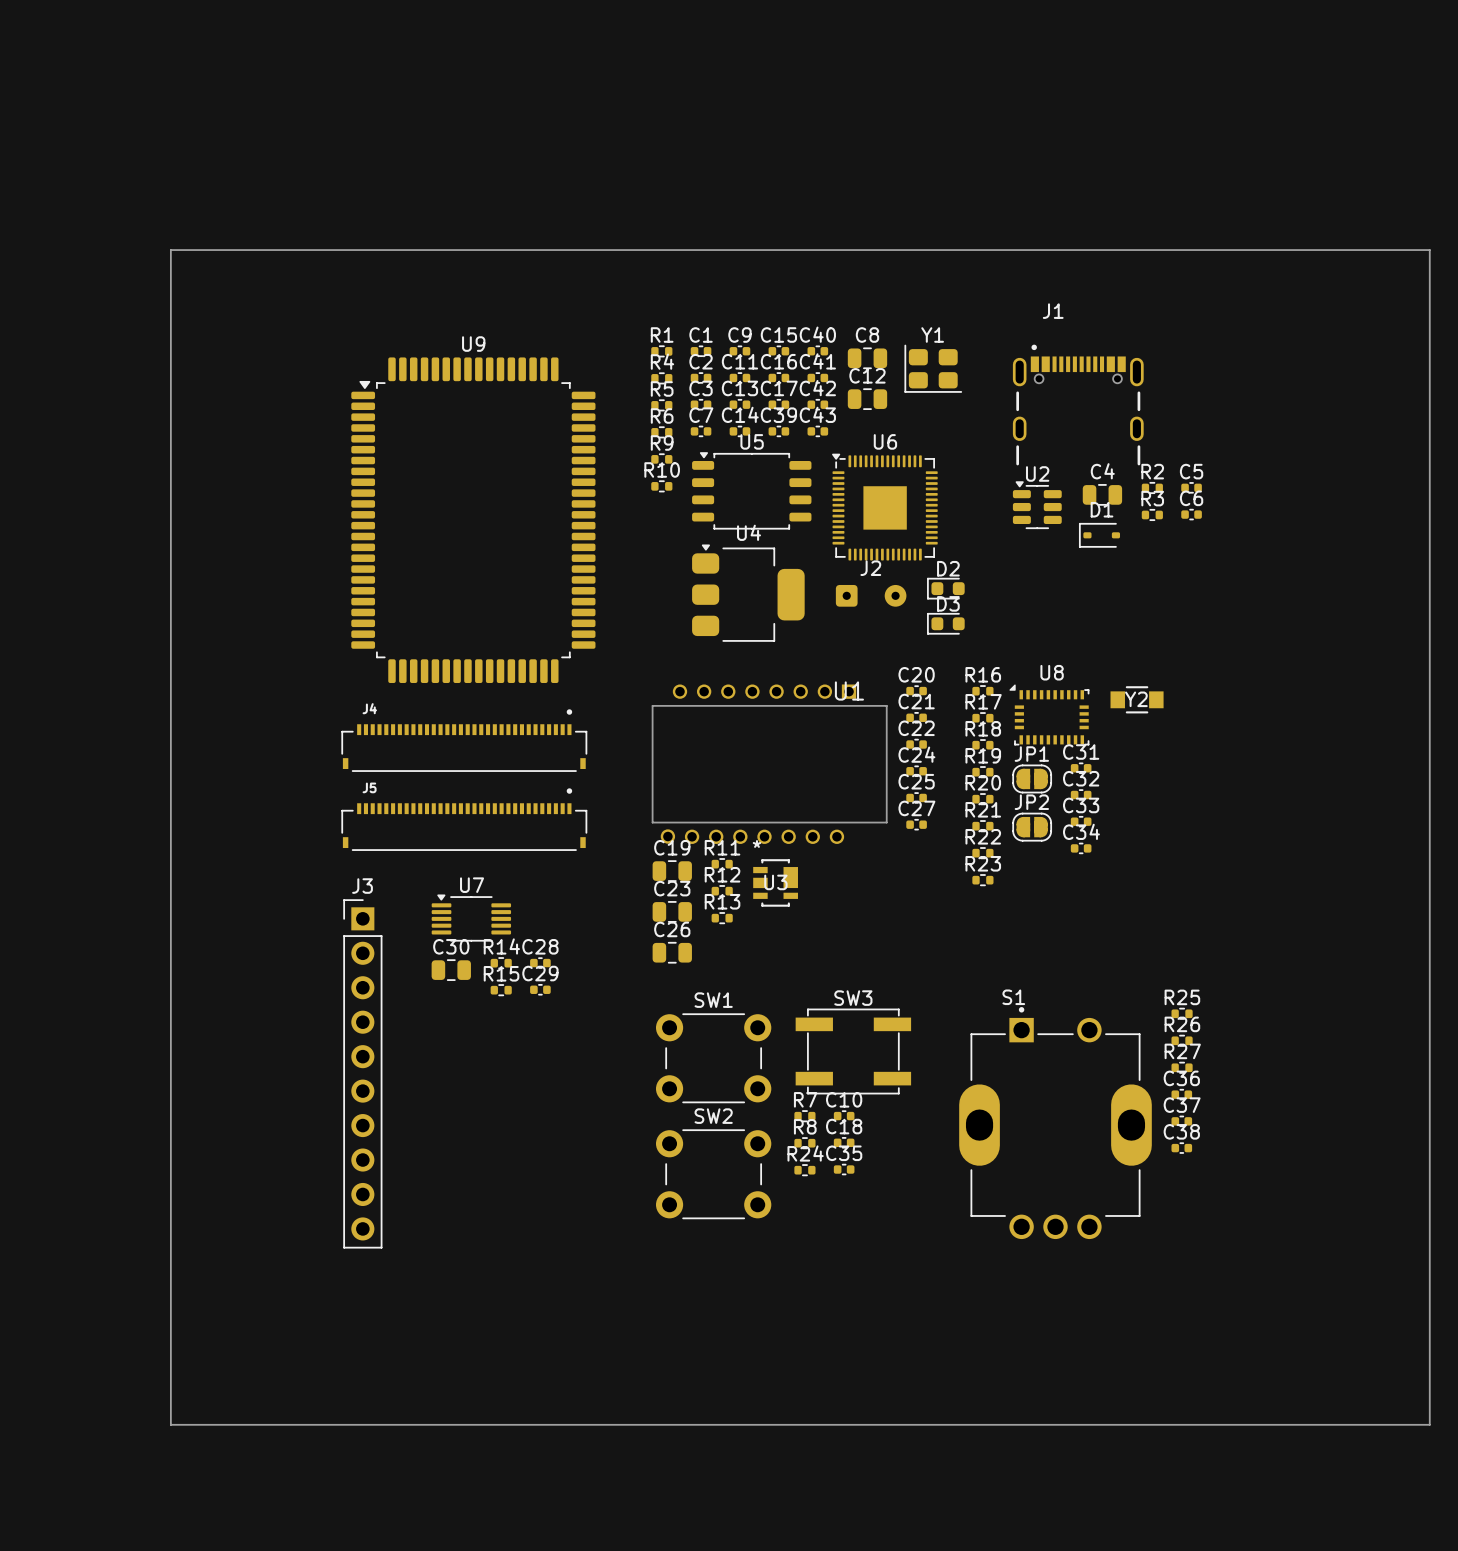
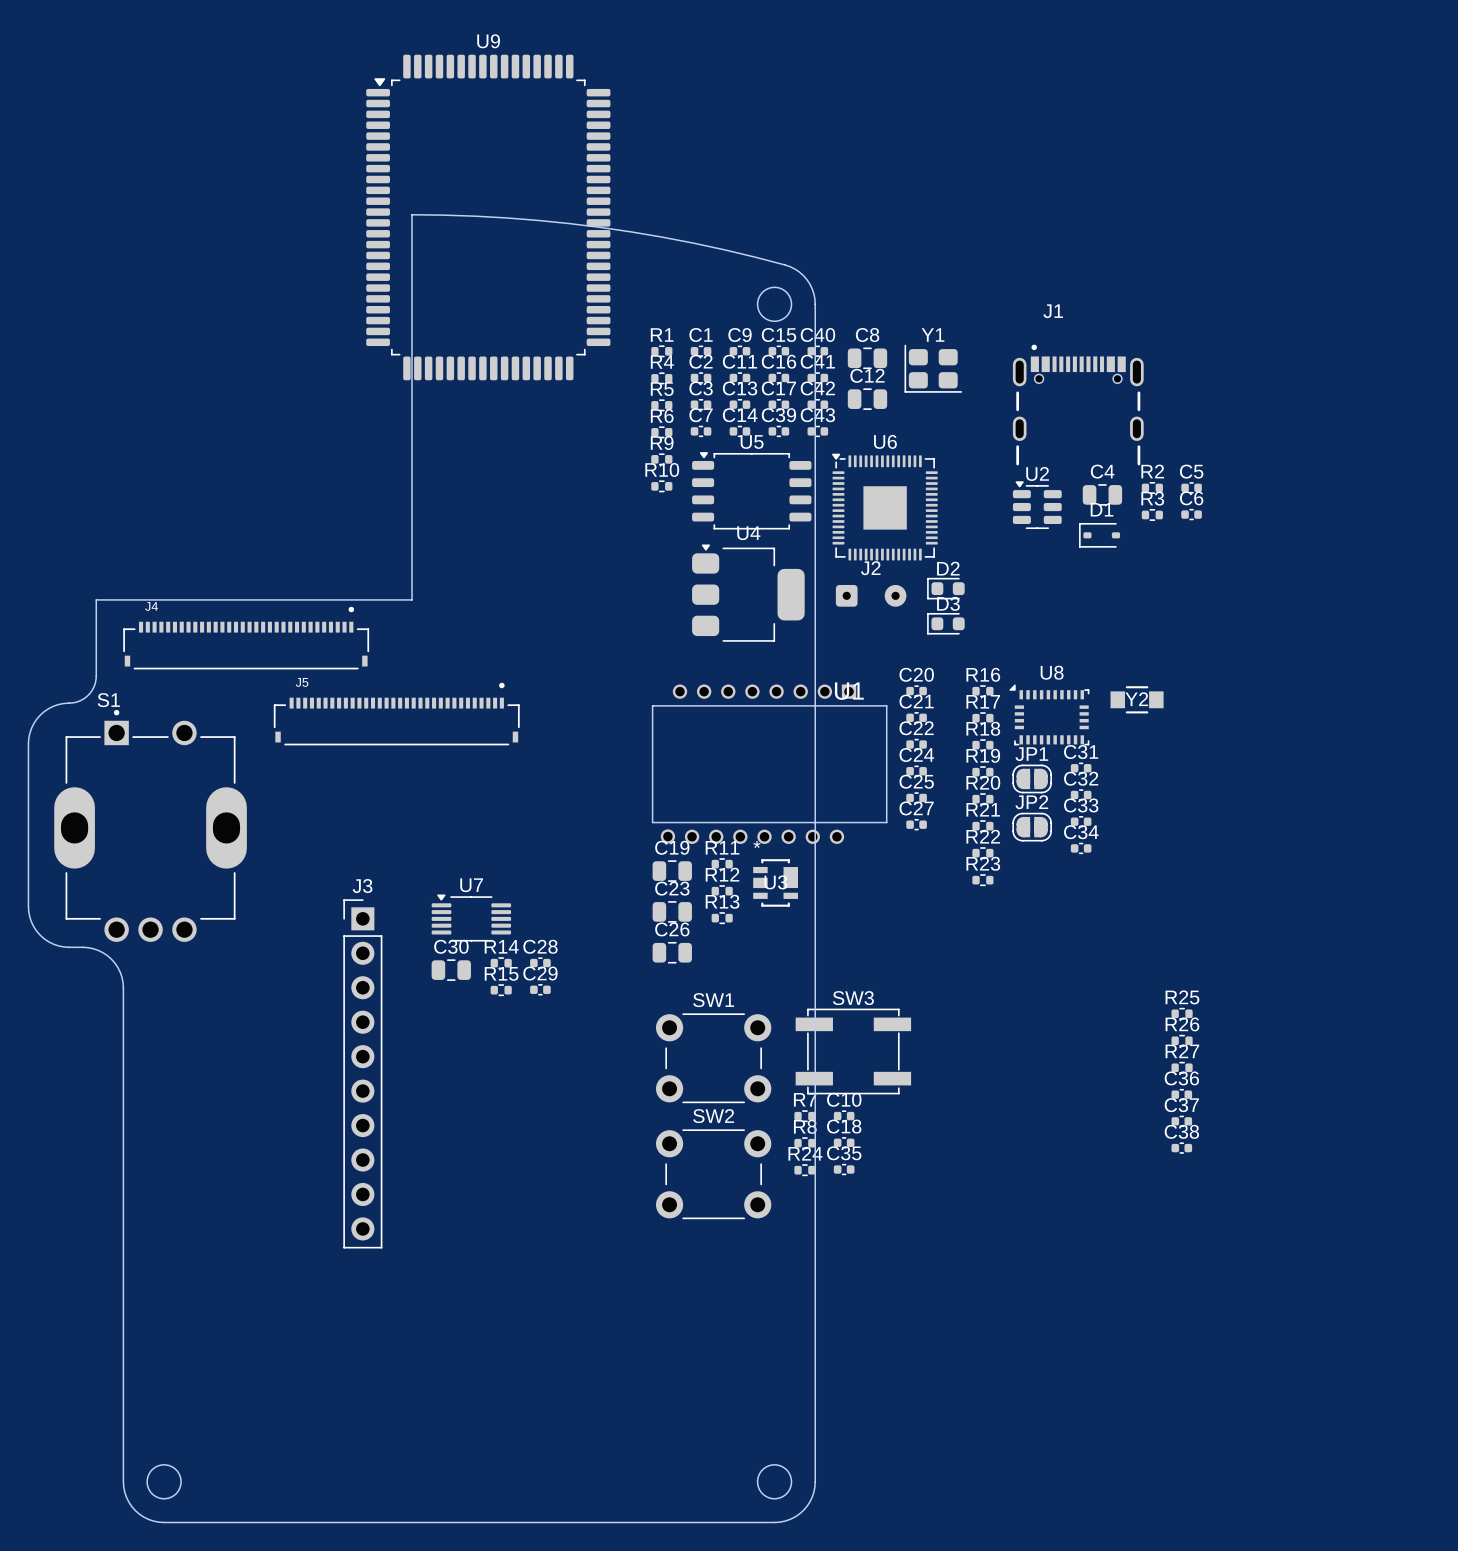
board edge: none -> (412, 214) (412, 599) (96, 599) (96, 676) (93, 687) (88, 695) (80, 700) (58, 704) (44, 711) (33, 723) (29, 733) (28, 906) (31, 922) (40, 935) (53, 944) (63, 946) (88, 947) (103, 952) (115, 963) (123, 982) (124, 1492) (131, 1506) (139, 1514) (153, 1521) (164, 1522) (785, 1521) (799, 1514) (806, 1506) (813, 1492) (815, 1481) (813, 293) (806, 279) (790, 266) (693, 243) (631, 231) (537, 220) (412, 214)
board edge: (170, 250) (1429, 250) (1429, 1424) (170, 1424) (170, 250) -> none
round board edge: none -> [756, 286, 793, 322]
U9 position: (473, 520) -> (488, 217)
J4 position: (464, 740) -> (246, 638)
J5 position: (464, 819) -> (396, 714)
S1 position: (1055, 1123) -> (150, 825)
round board edge: none -> [146, 1464, 182, 1500]
round board edge: none -> [756, 1464, 793, 1500]

